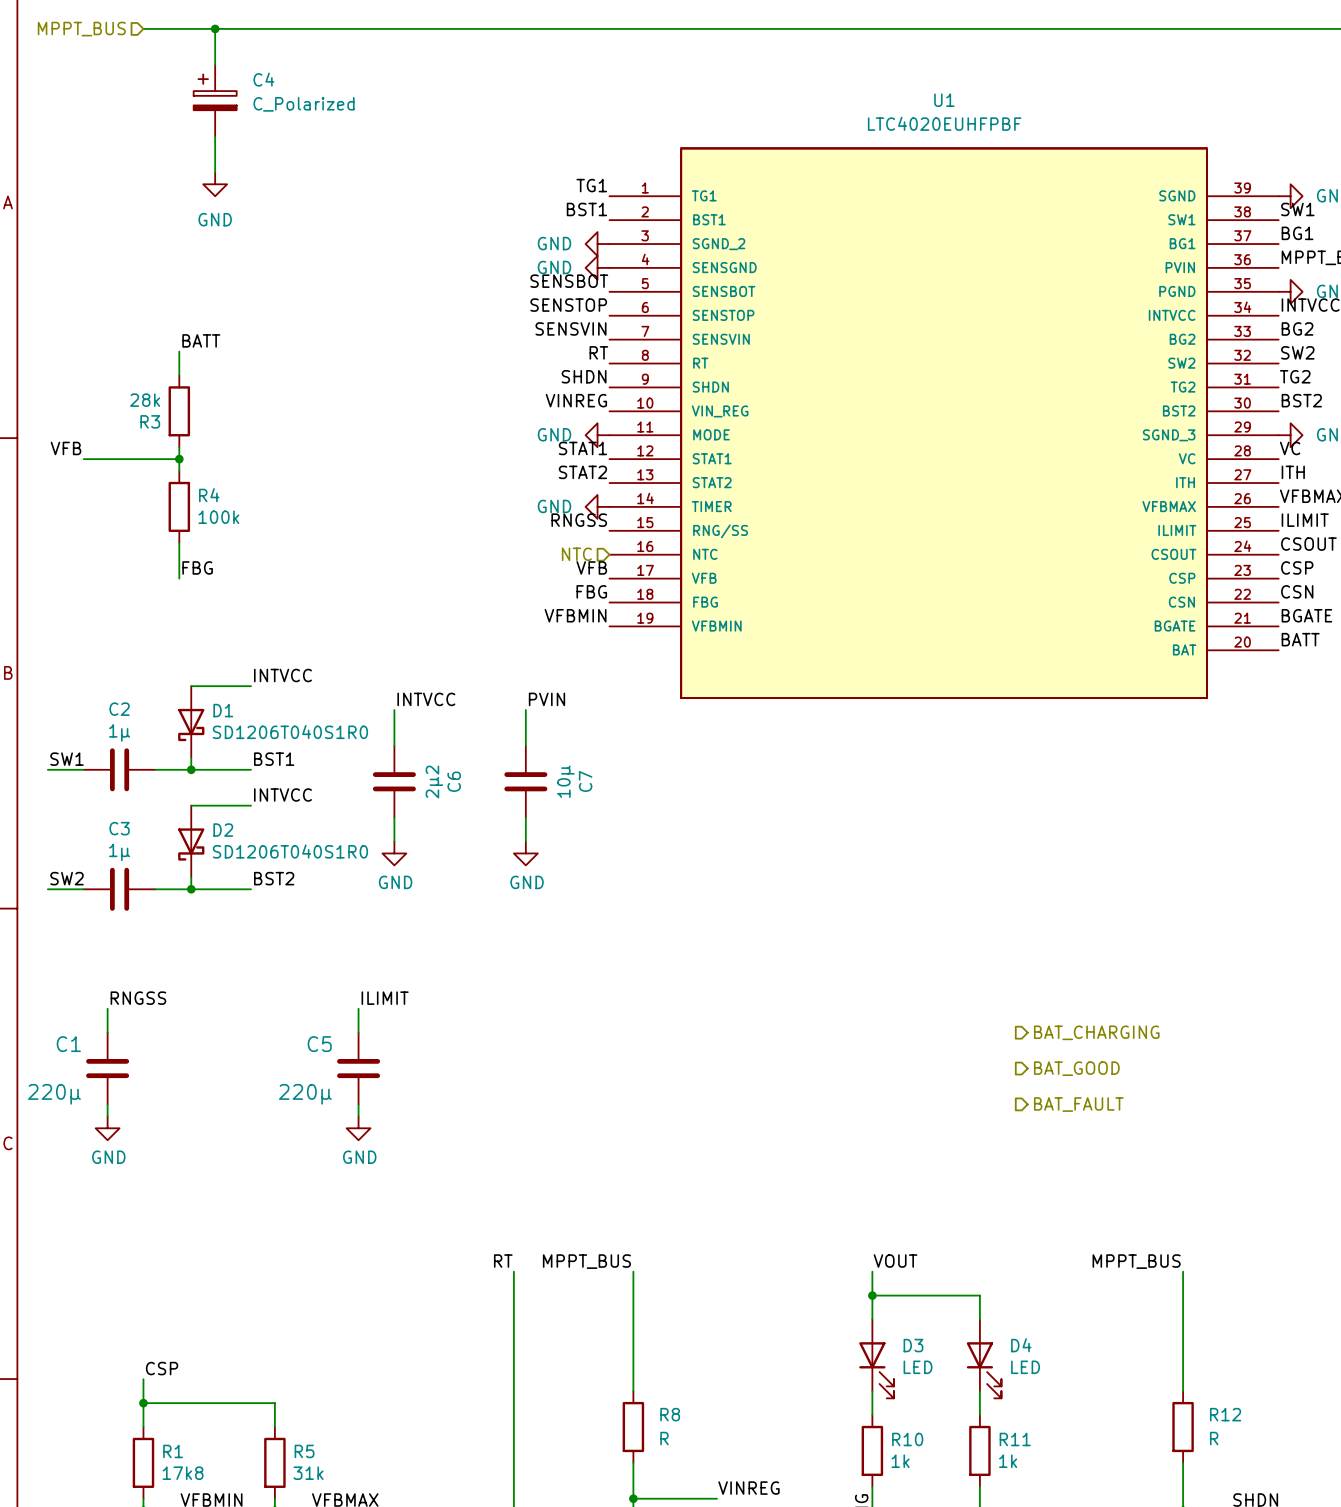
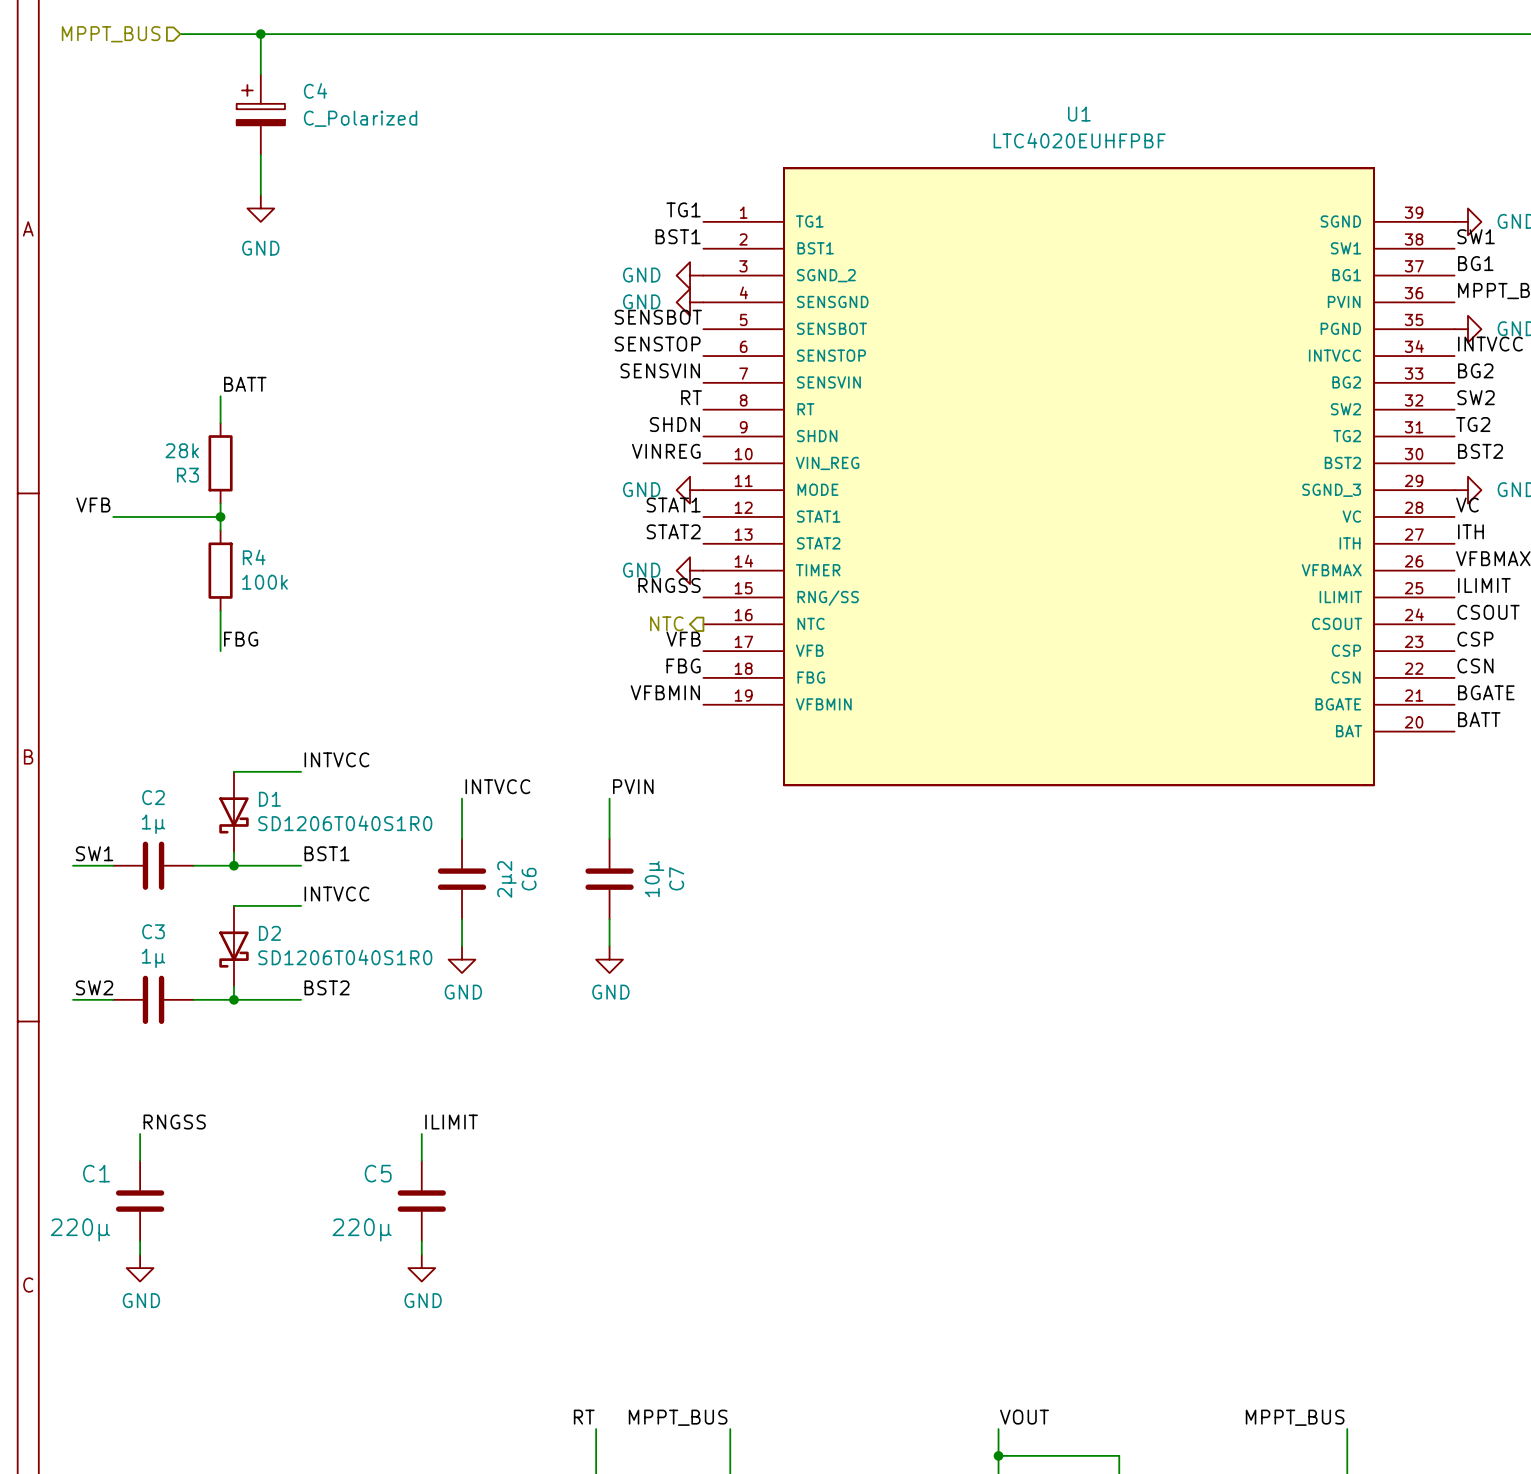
hierarchical label shape: input (576, 554) -> output (666, 623)
hierarchical label: BAT_CHARGING (1096, 1032) -> none
hierarchical label: BAT_GOOD (1076, 1068) -> none
hierarchical label: BAT_FAULT (1078, 1104) -> none

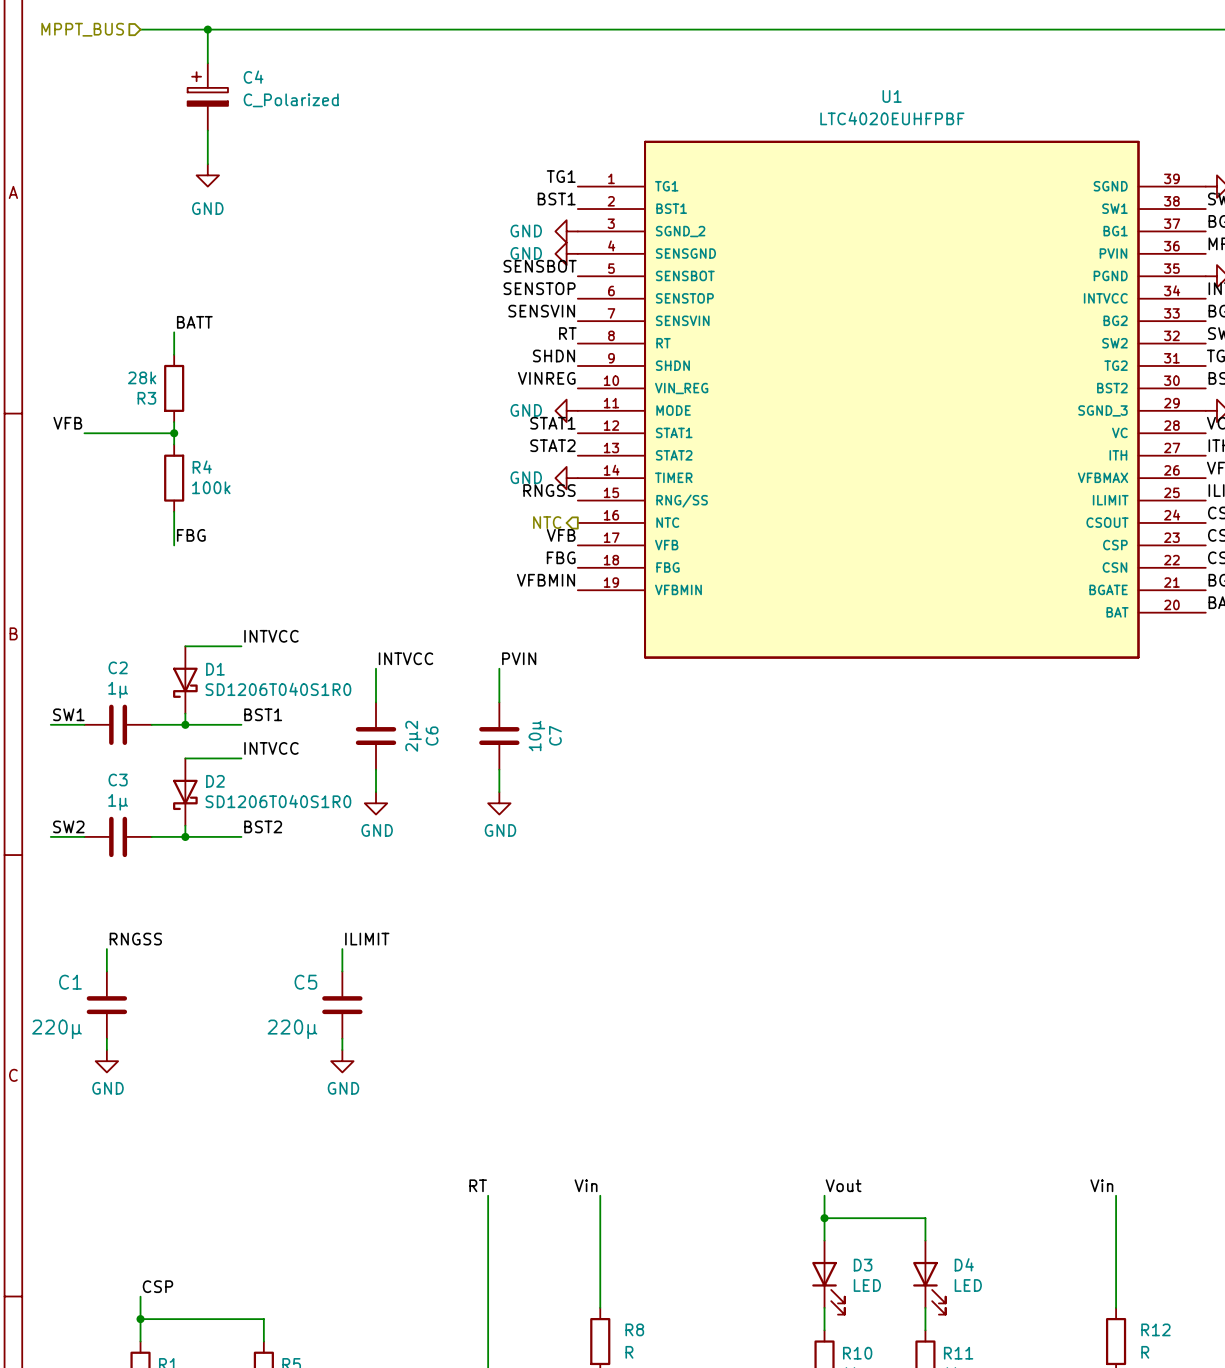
label: MPPT_BUS (678, 1417) -> Vin (586, 1185)
label: VOUT (1024, 1417) -> Vout (843, 1185)
label: MPPT_BUS (1295, 1417) -> Vin (1101, 1185)

